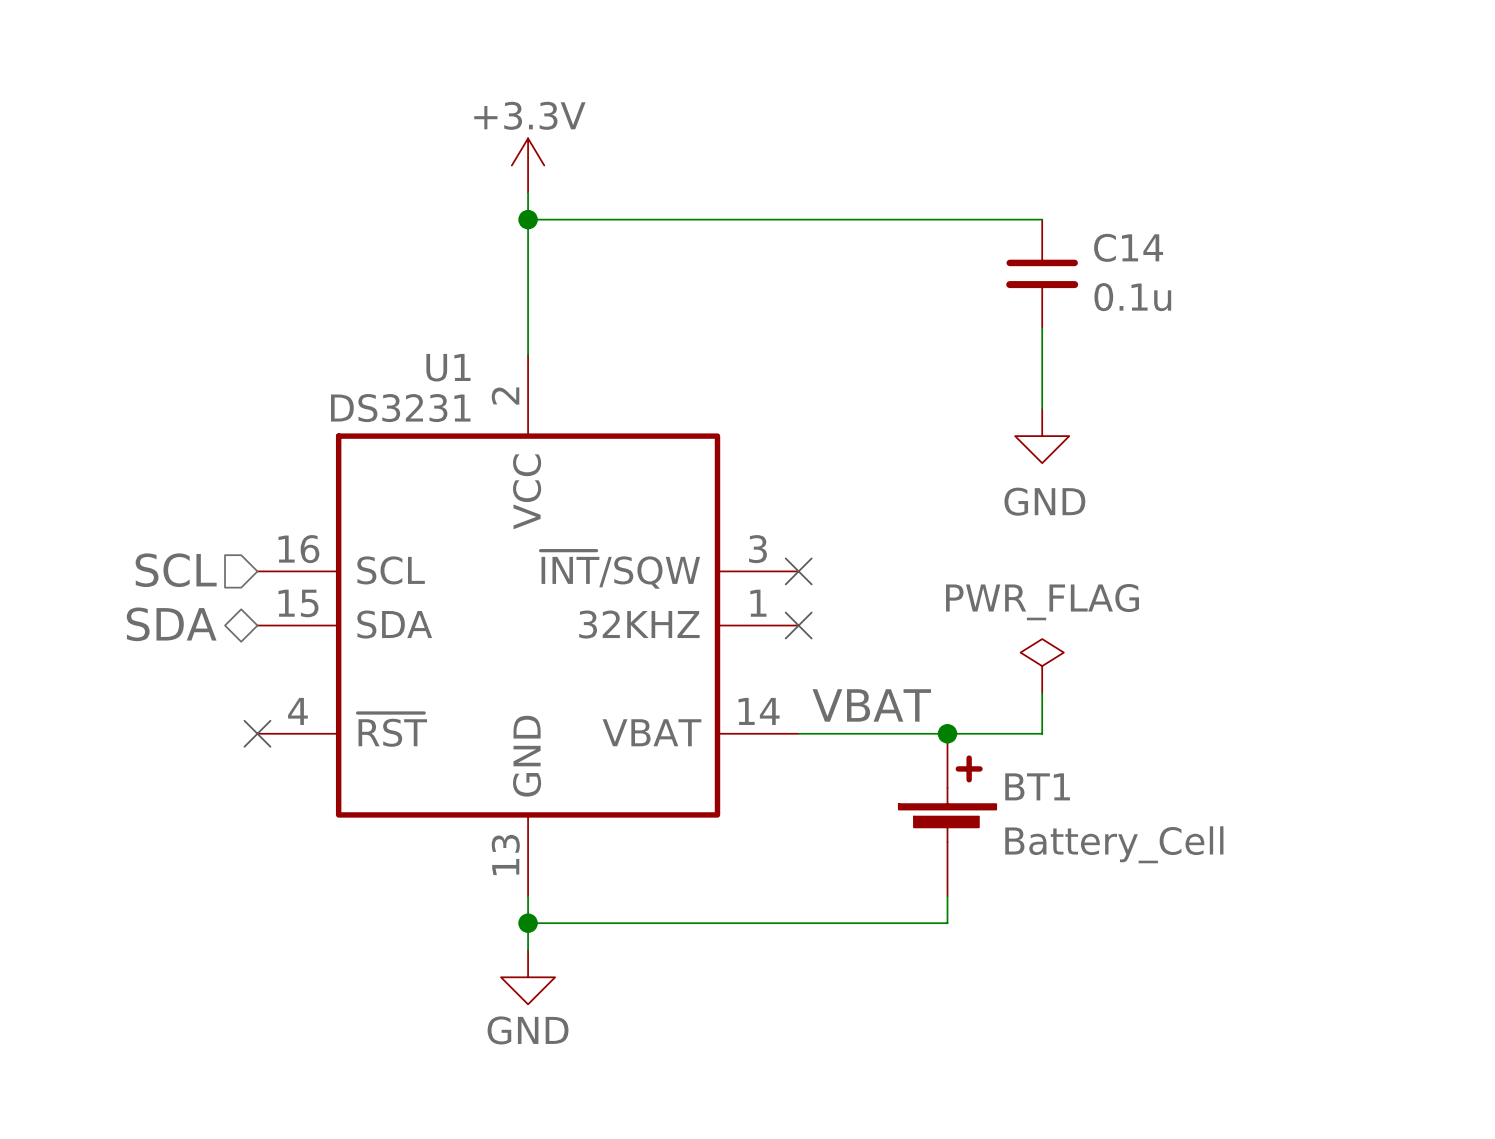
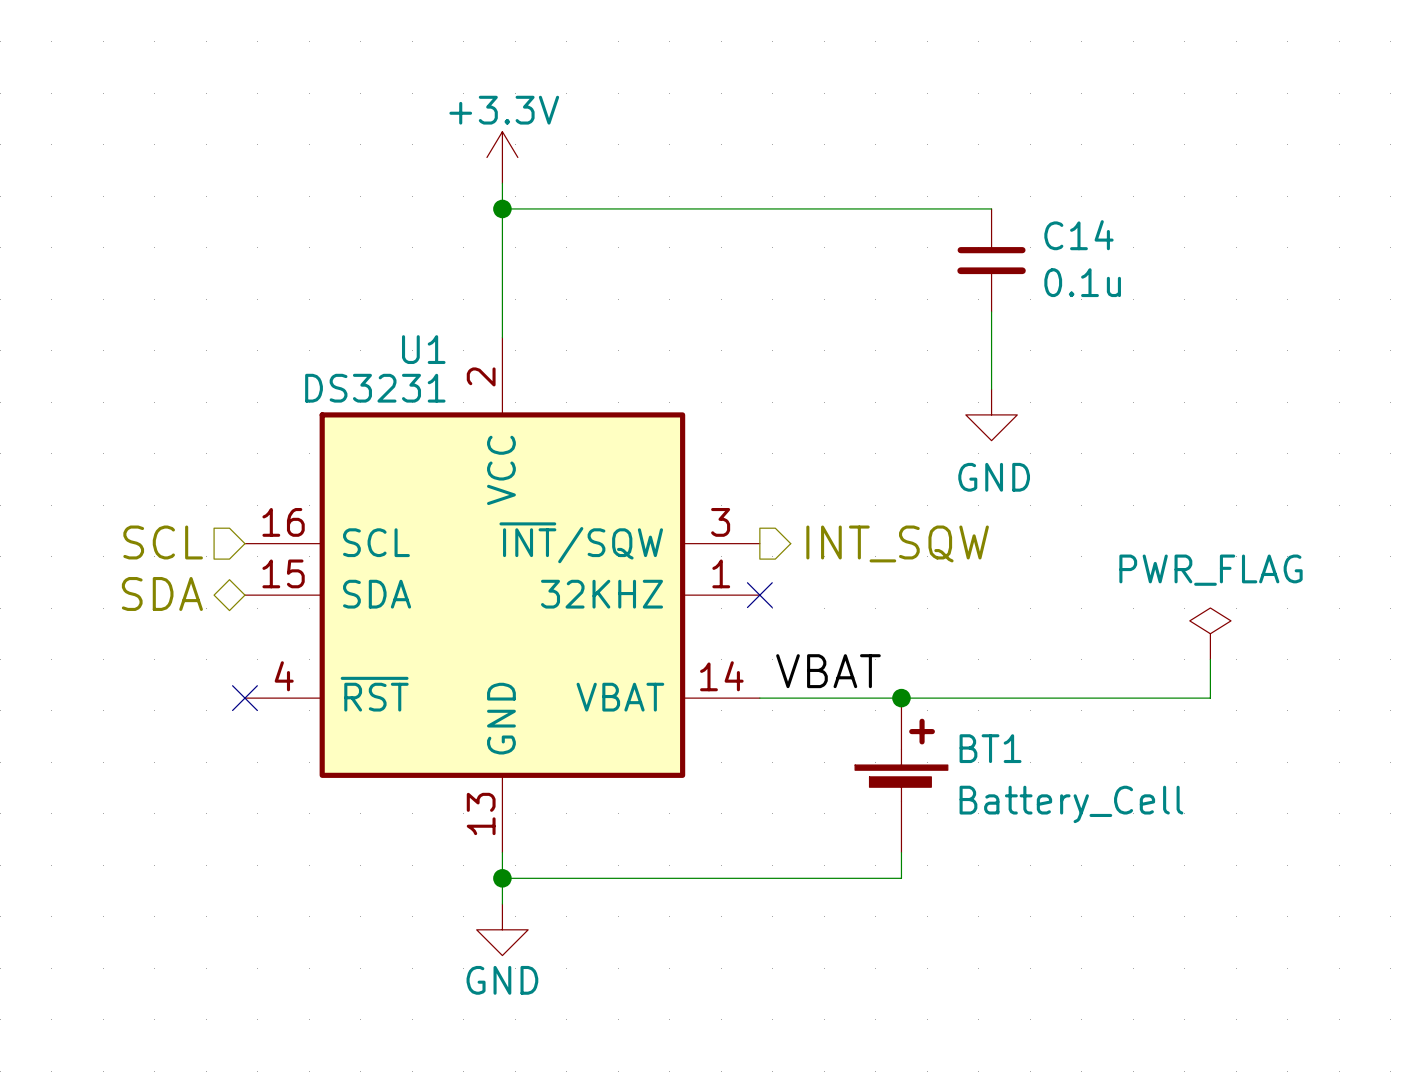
no-connect mark: (798, 571) -> none
hierarchical label: none -> INT_SQW (897, 543)
power symbol position: PWR_FLAG (1042, 666) -> PWR_FLAG (1210, 633)
wire: (1042, 693) (1042, 733) -> (1210, 659) (1210, 698) (991, 698)

